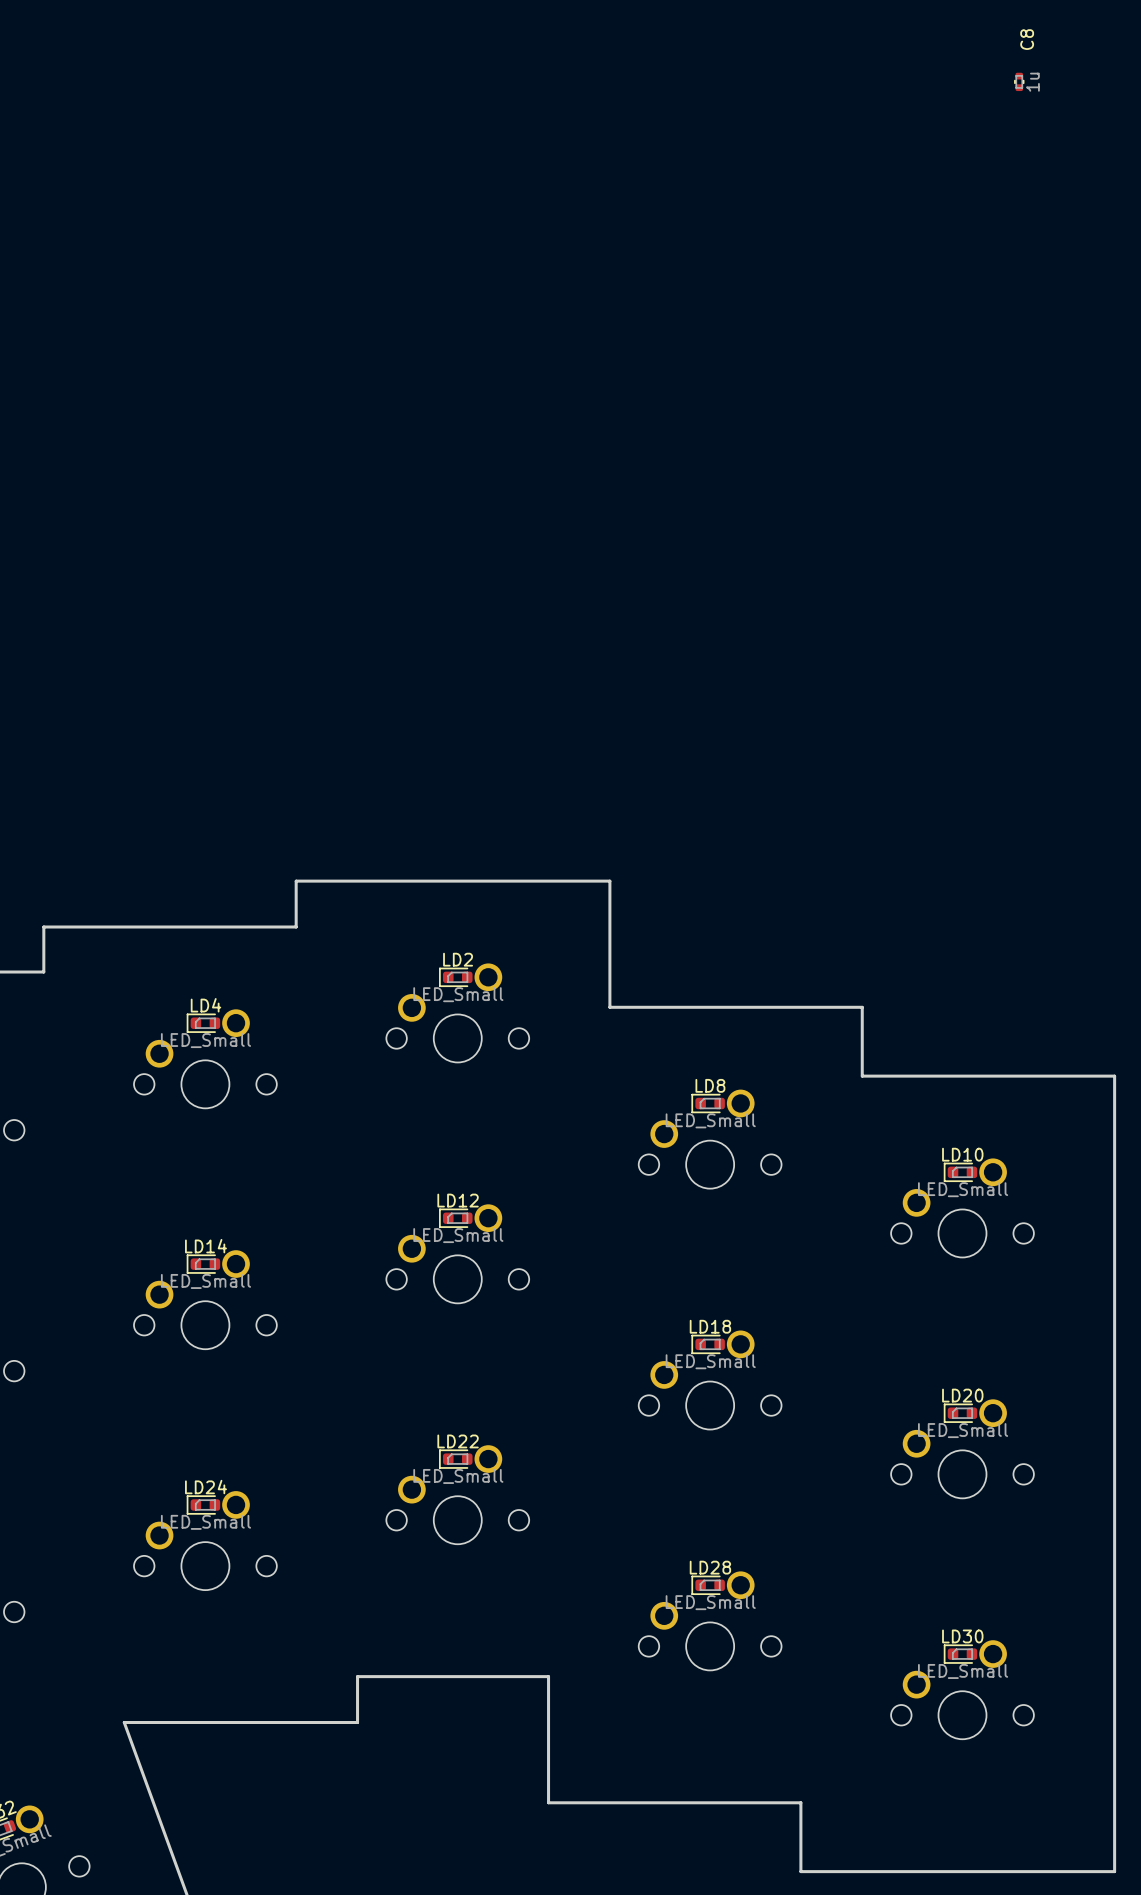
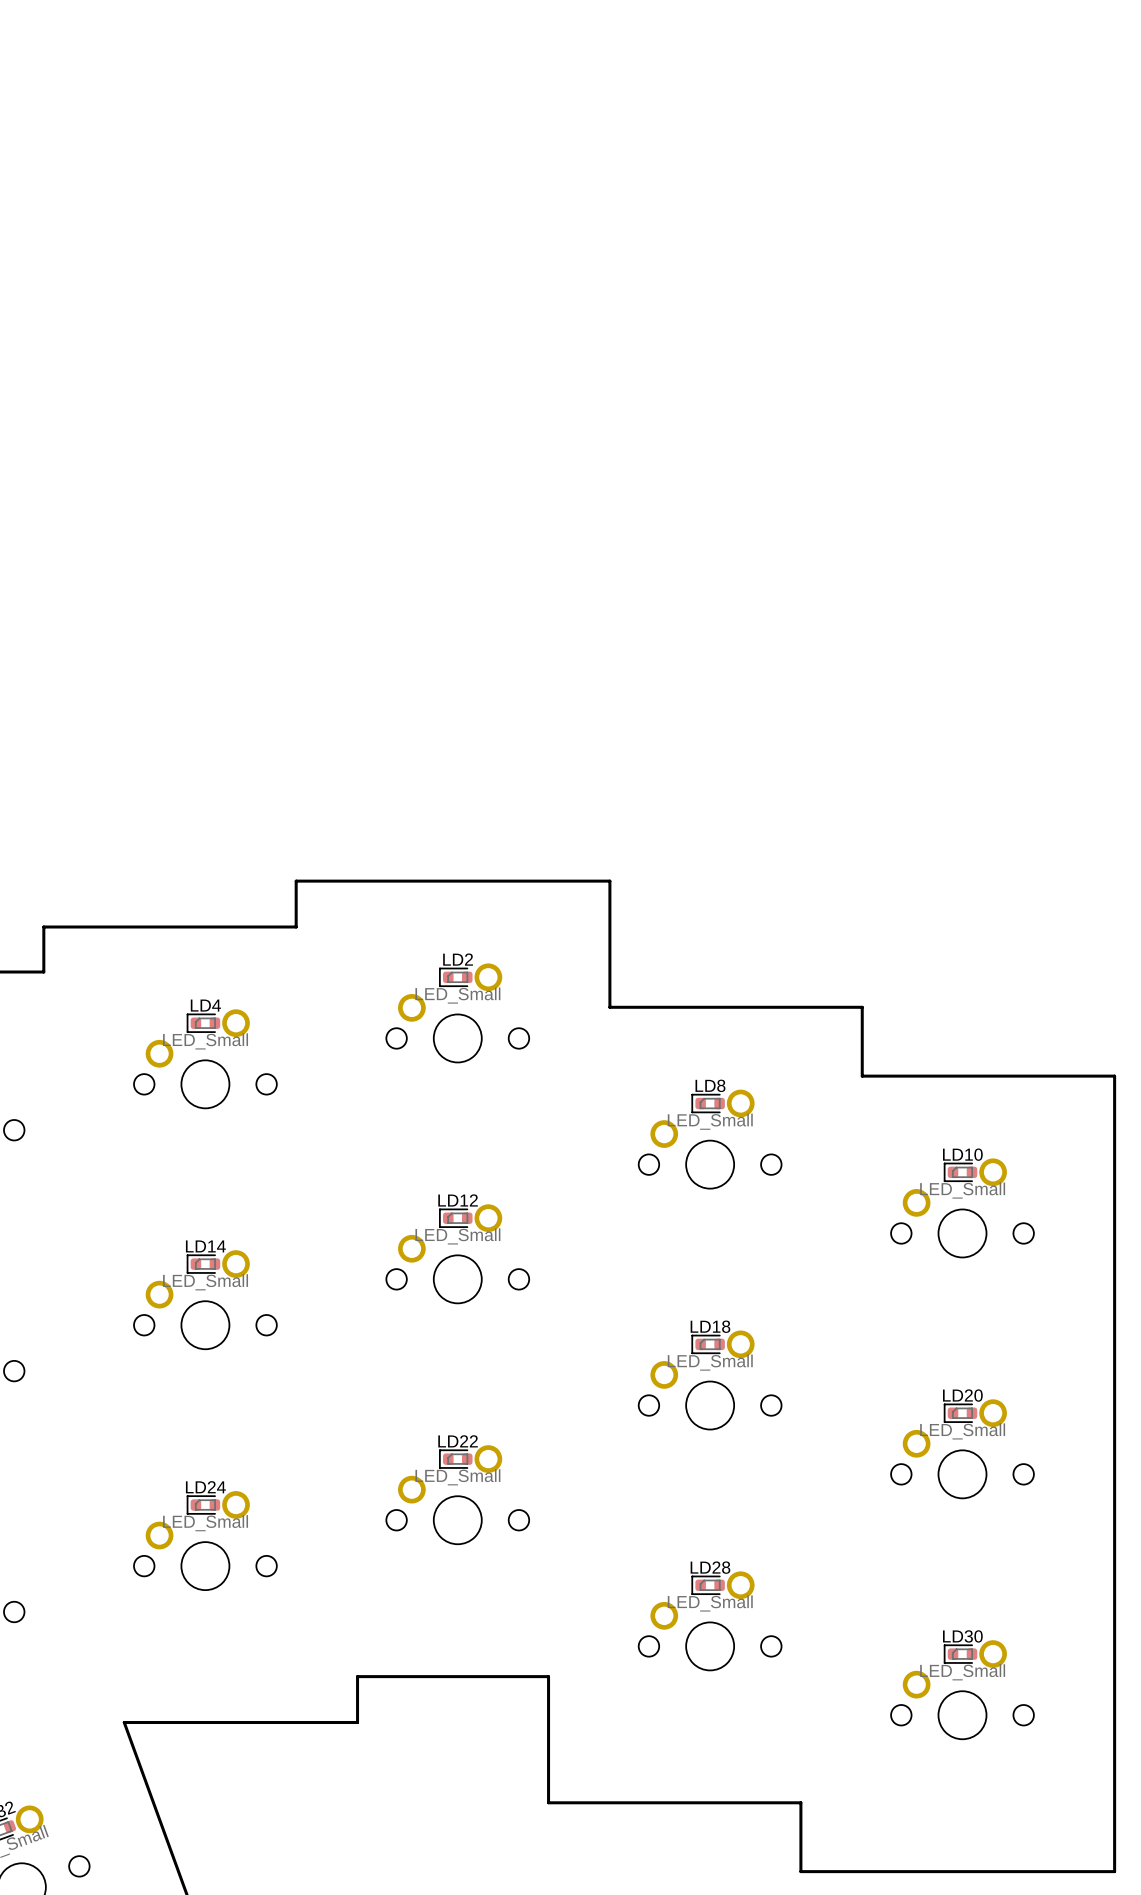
C8: 1u (1019, 81) -> none

